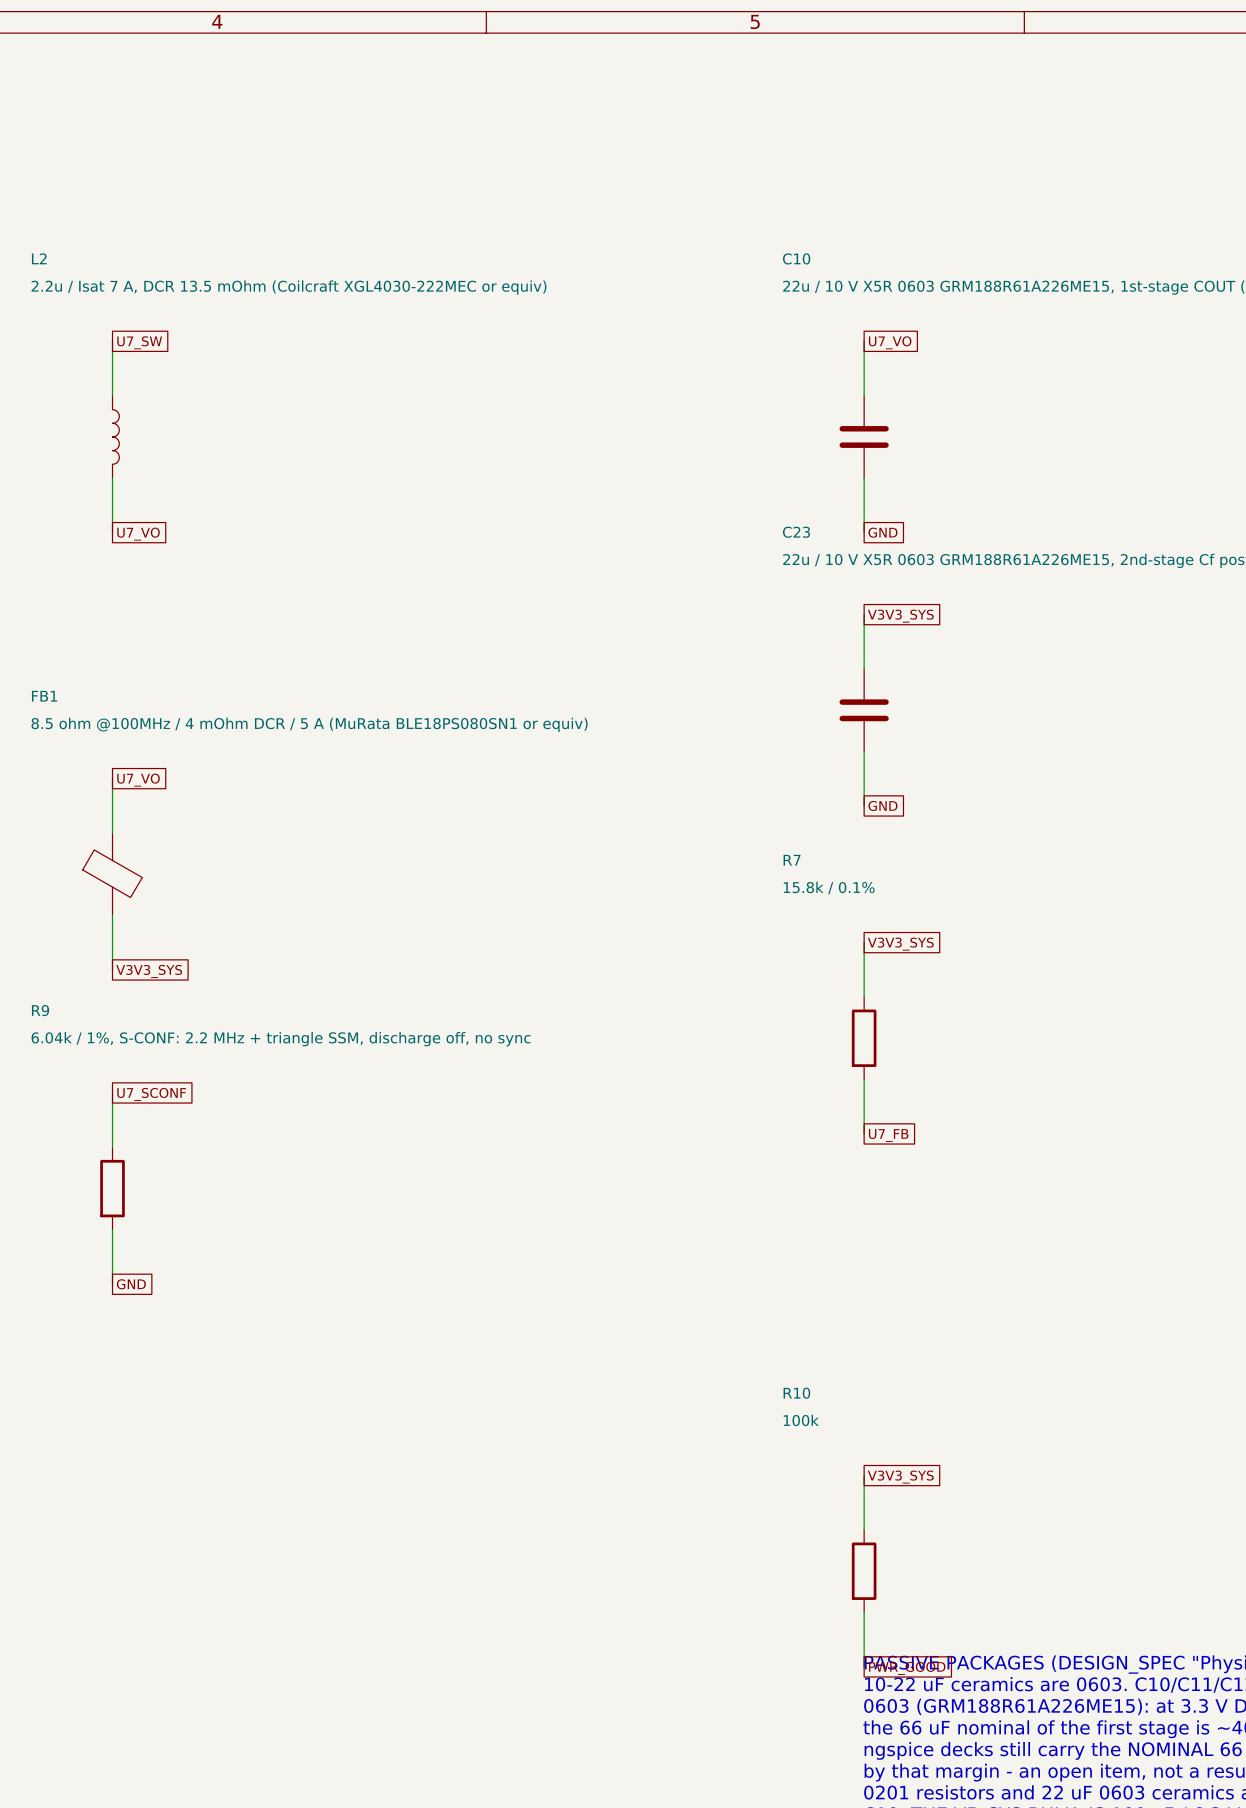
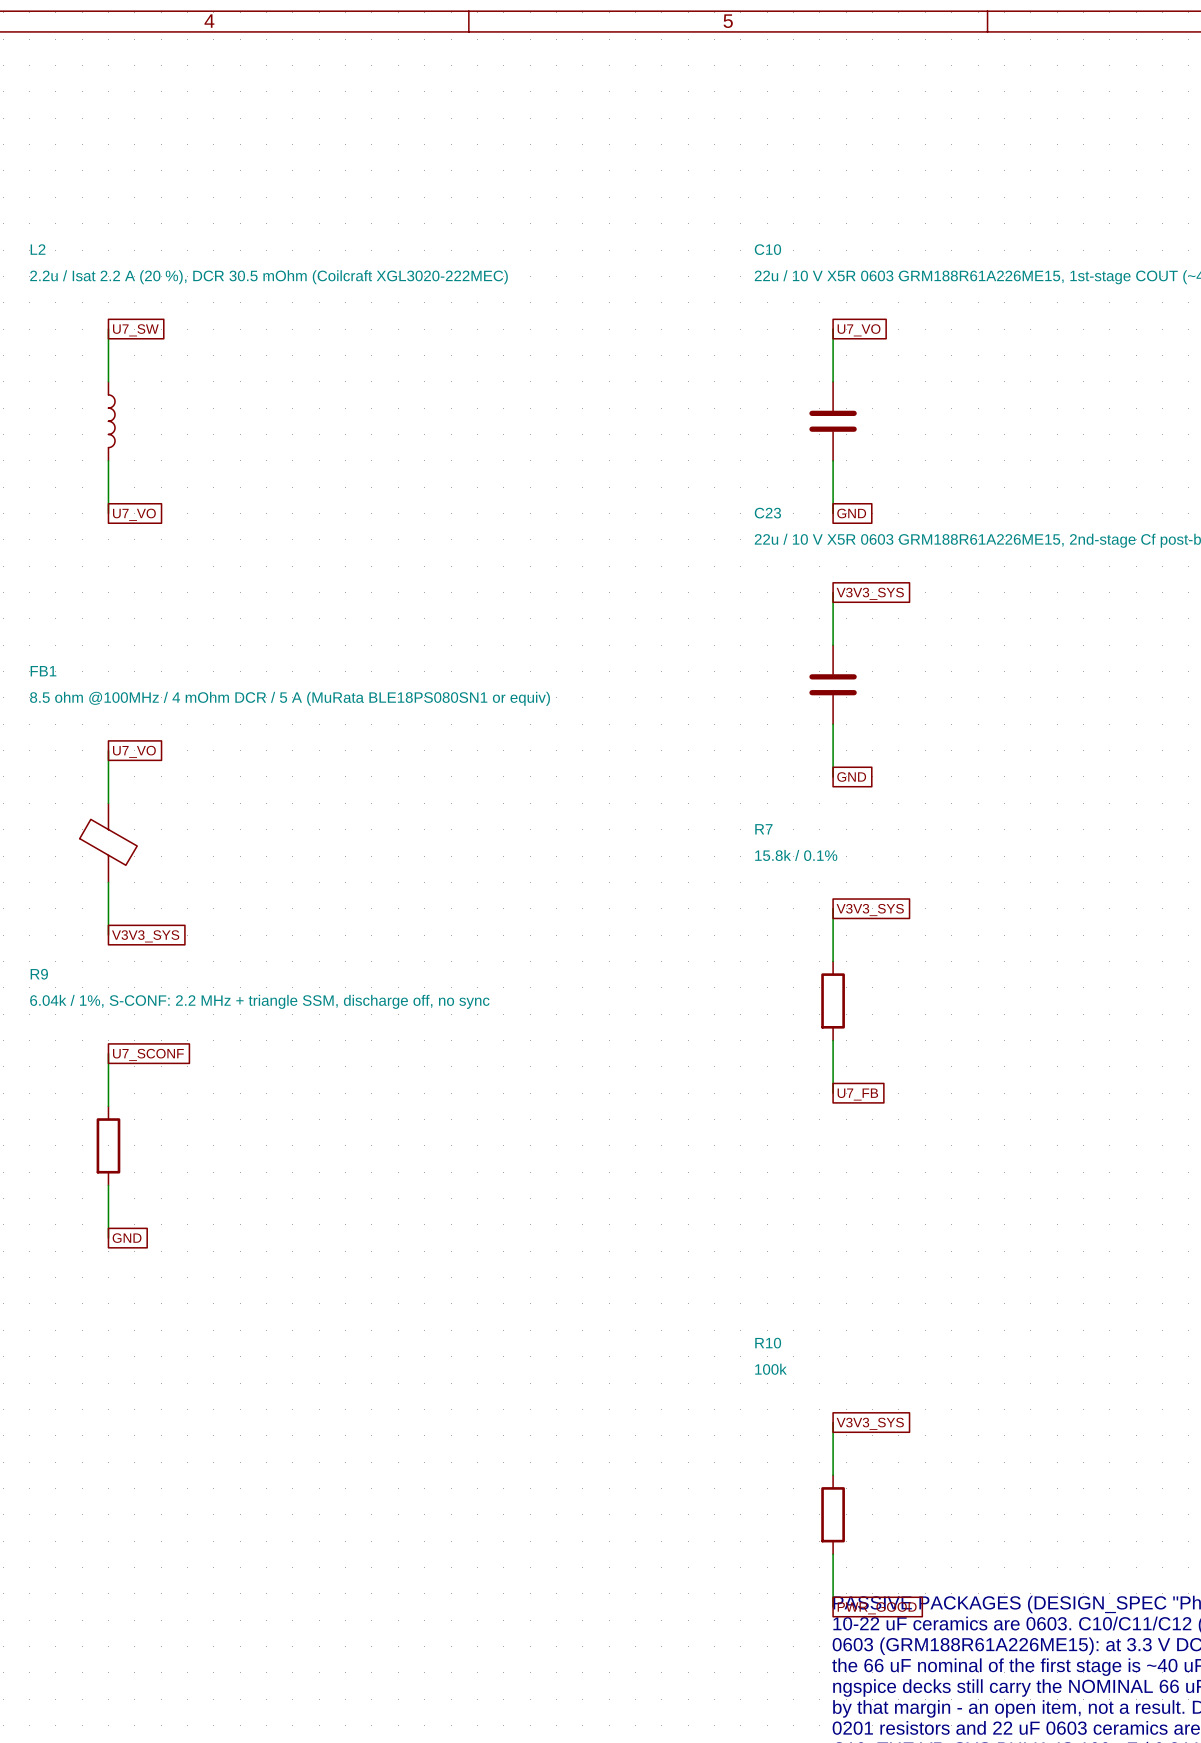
L2 value: 2.2u / Isat 7 A, DCR 13.5 mOhm (Coilcraft XGL4030-222MEC or equiv) (289, 287) -> 2.2u / Isat 2.2 A (20 %), DCR 30.5 mOhm (Coilcraft XGL3020-222MEC) (269, 277)

